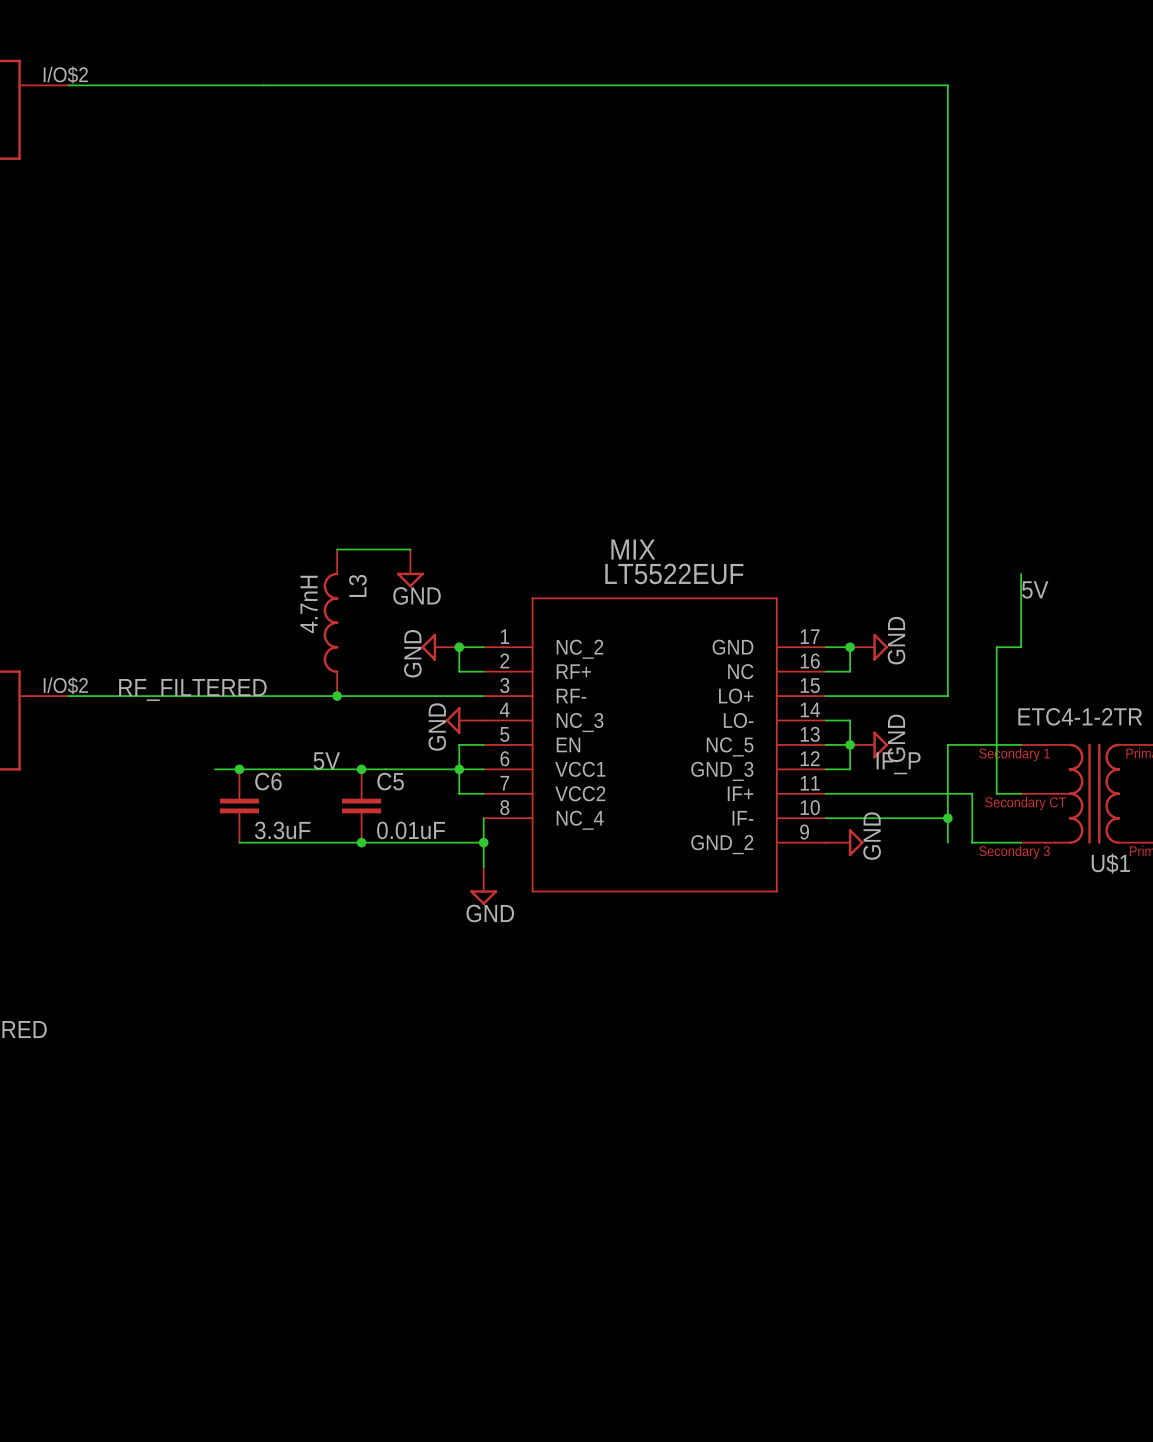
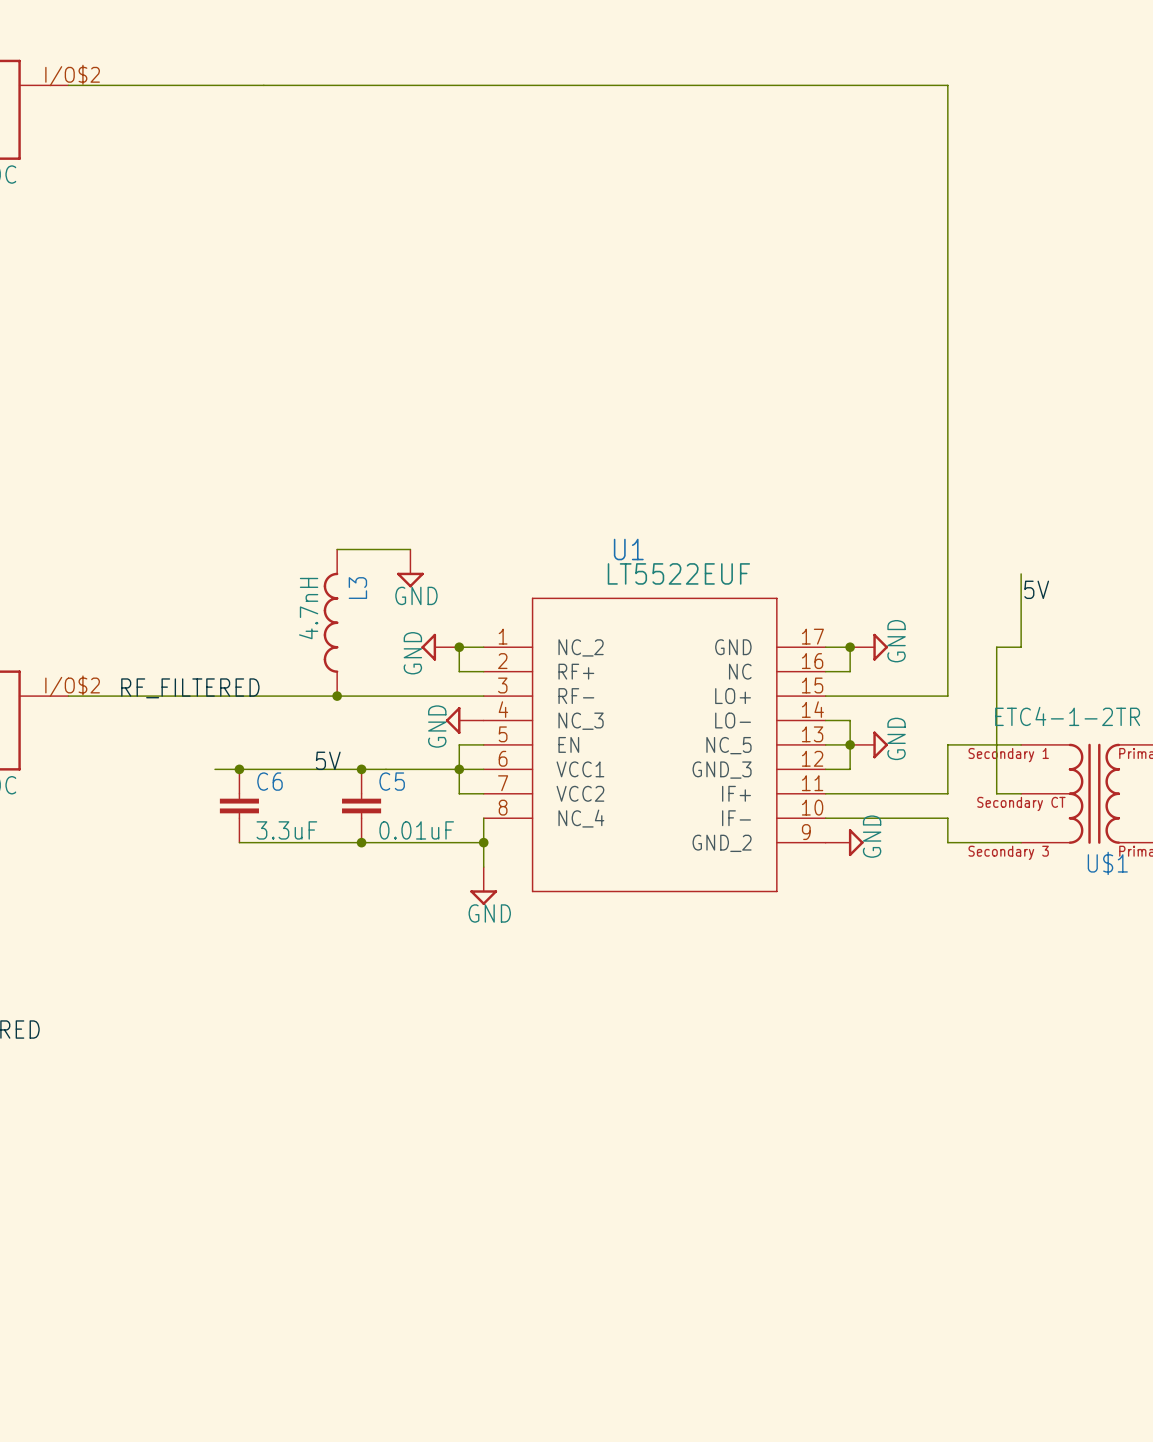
MIX name: MIX (633, 549) -> U1 (628, 549)
label: IF_P (898, 763) -> none
wire: (947, 818) (947, 793) (972, 793) (972, 842) -> (947, 842) (972, 842)
junction: (947, 818) -> none

